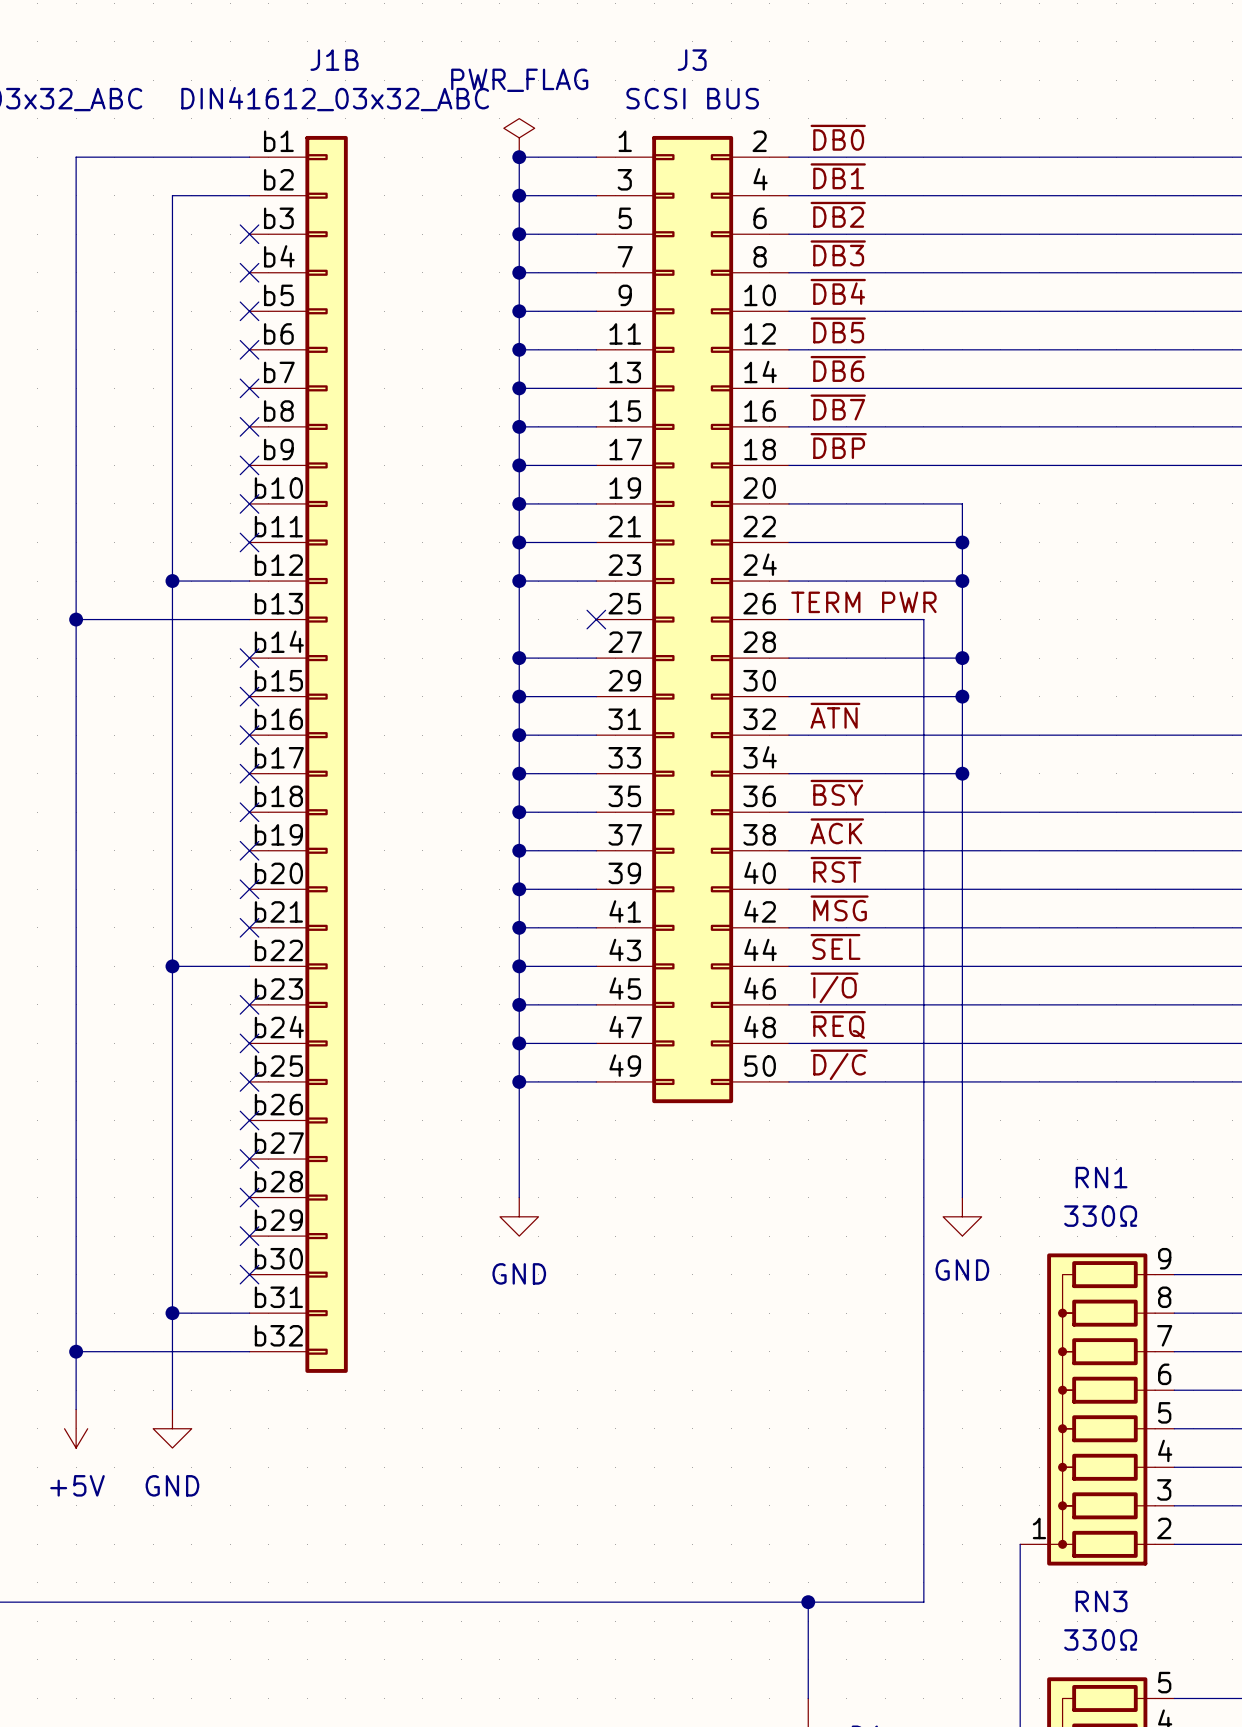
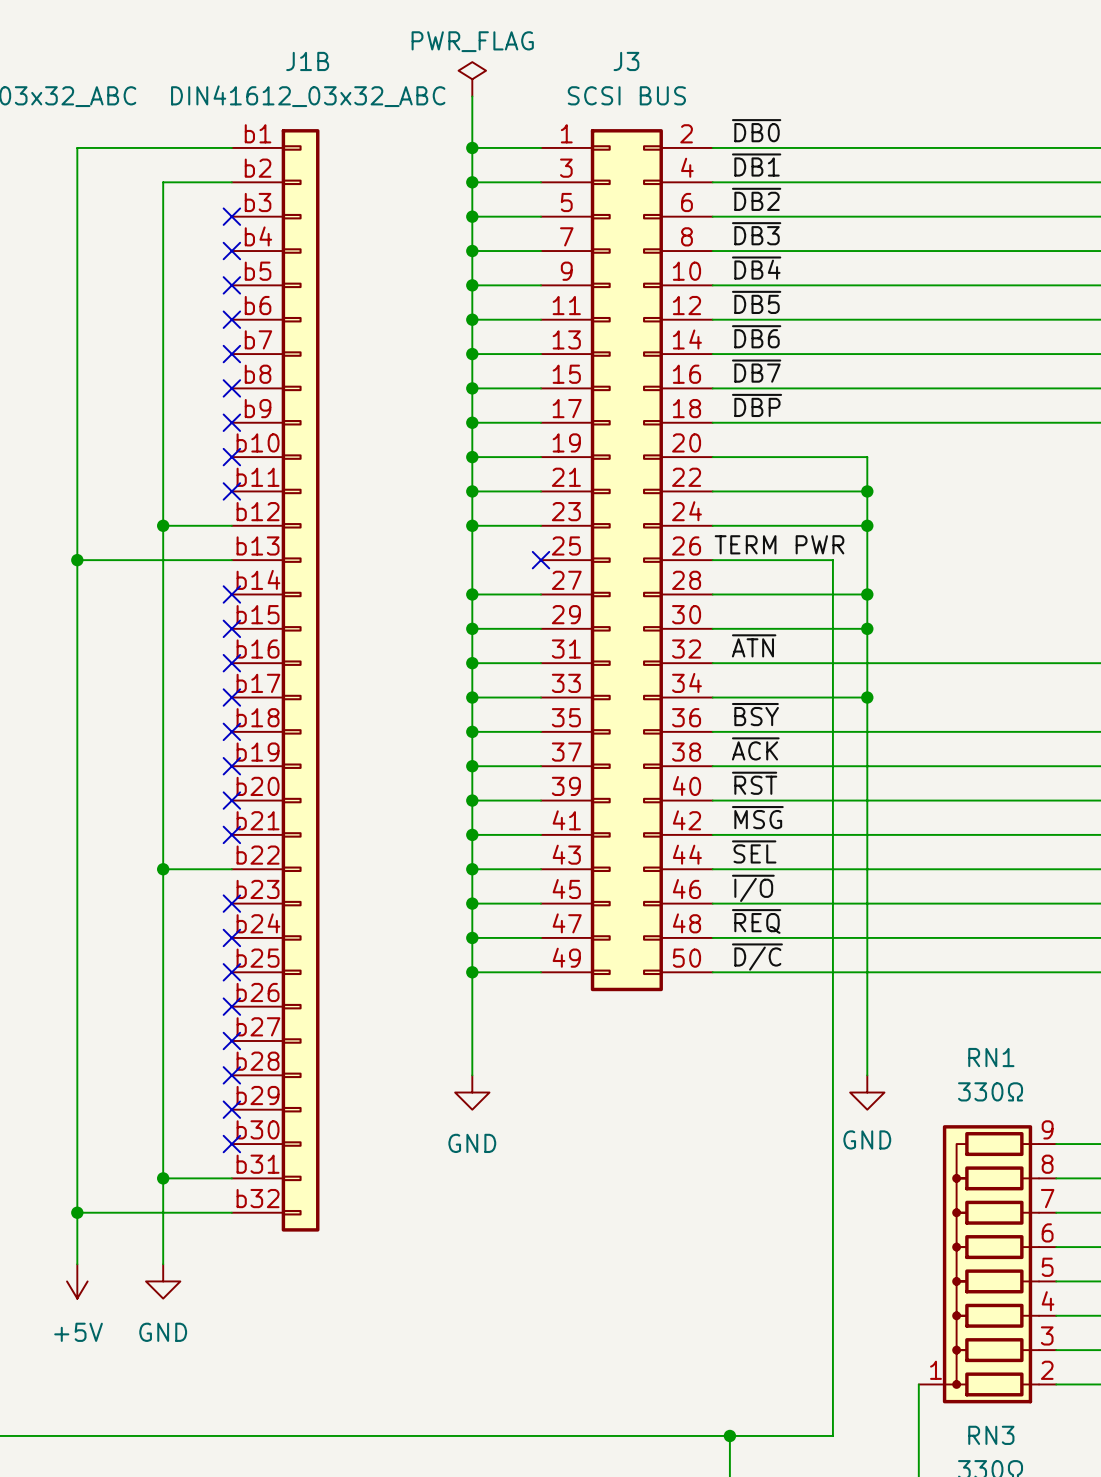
power symbol text position: PWR_FLAG (519, 80) -> PWR_FLAG (472, 41)
wire: none -> (472, 96) (472, 147)
power symbol position: PWR_FLAG (519, 137) -> PWR_FLAG (472, 79)

